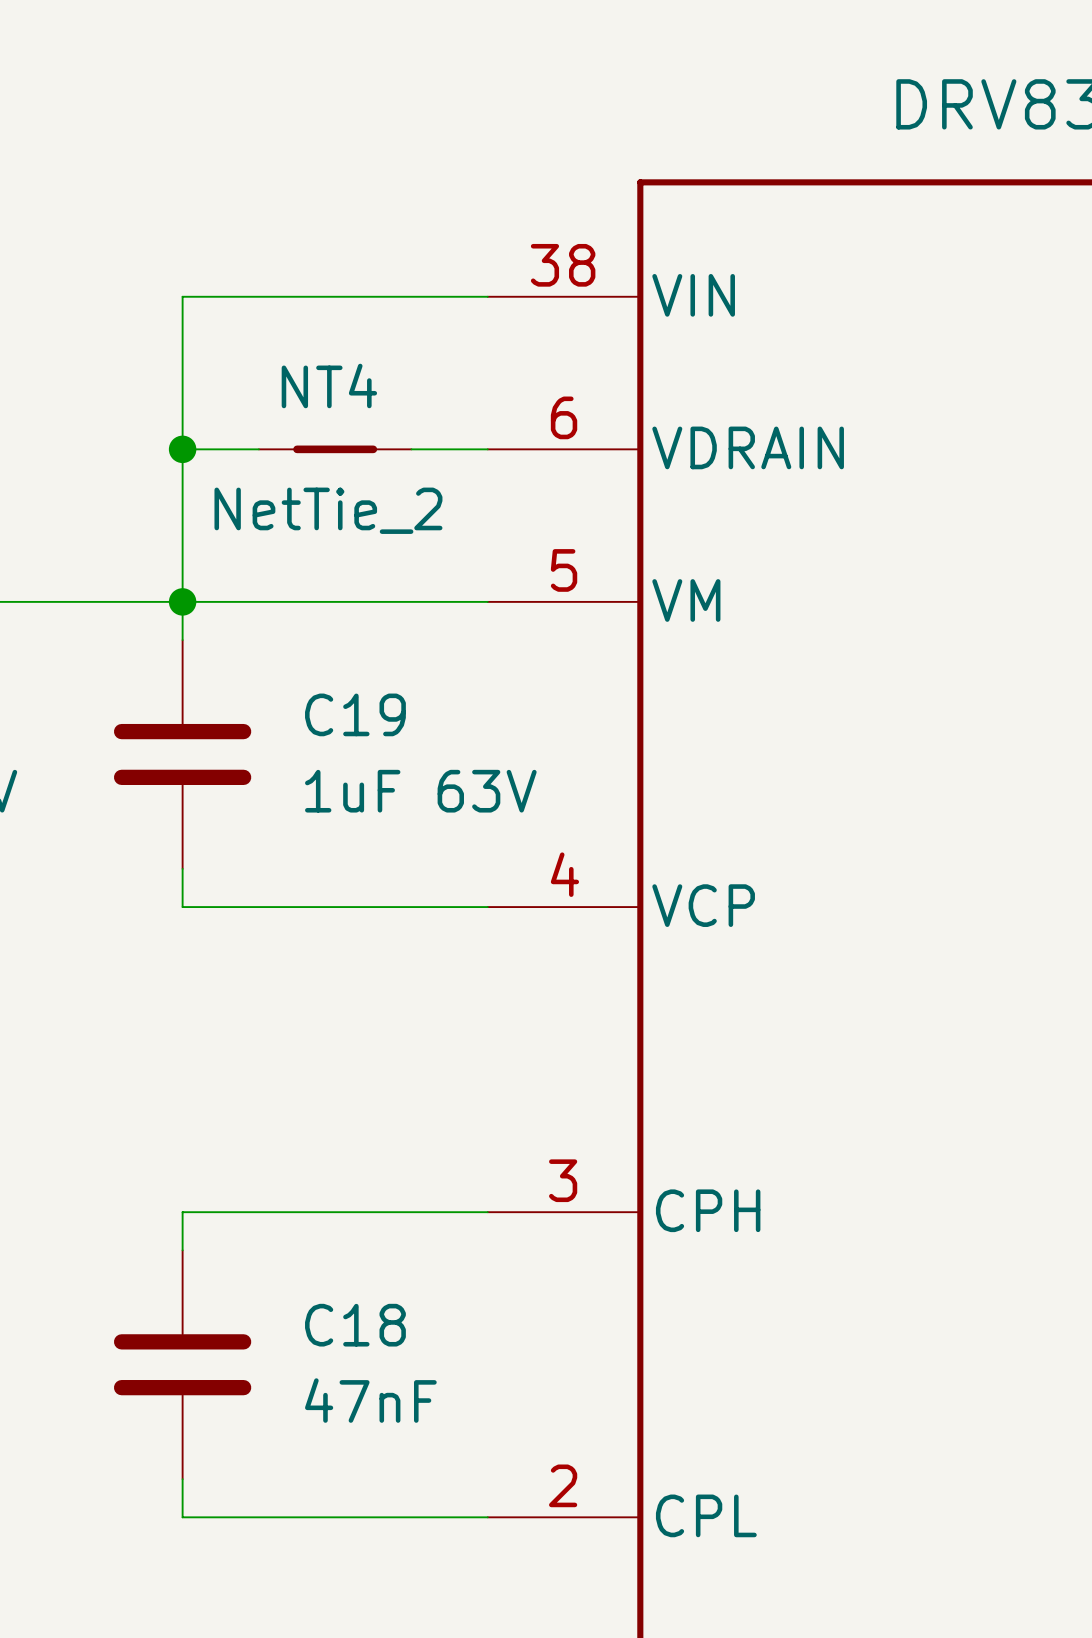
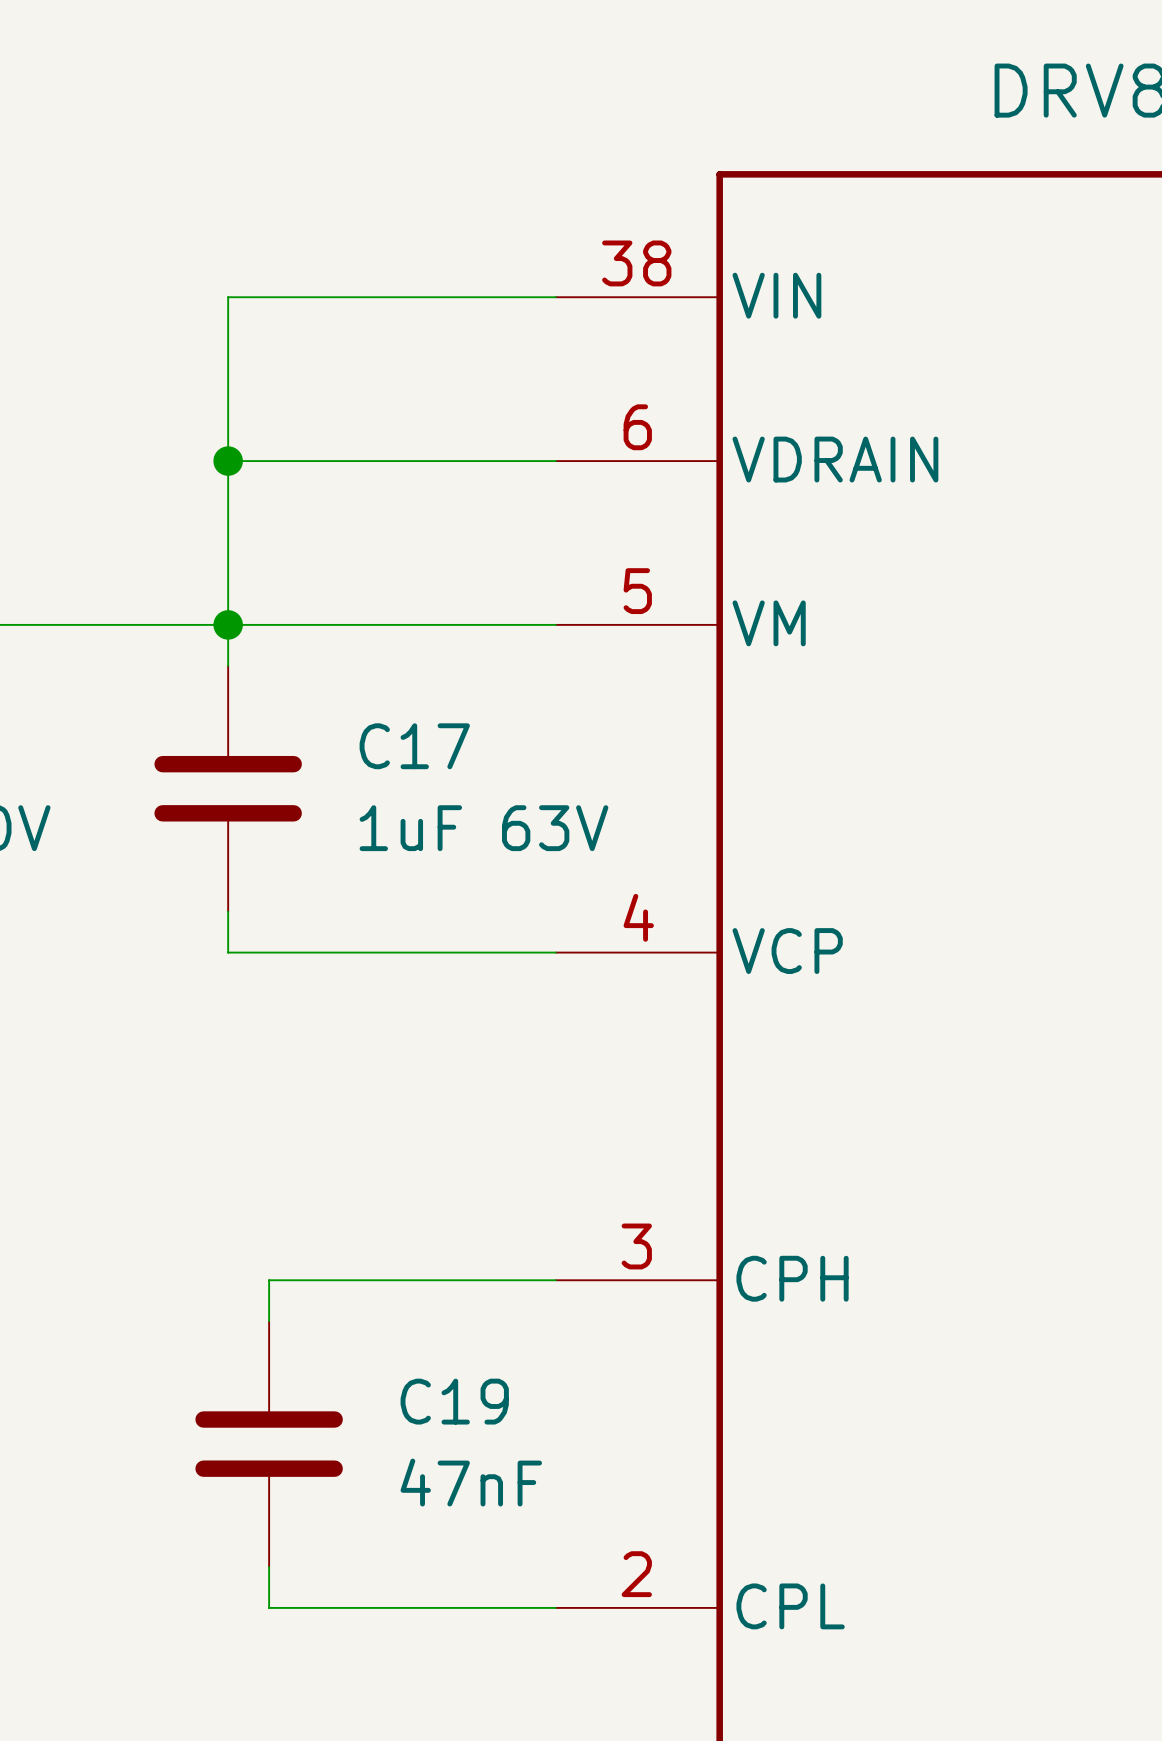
NT4: NetTie_2 (335, 449) -> none
C19 name: C19 (355, 714) -> C17 (414, 746)
wire: (220, 1212) (182, 1212) (182, 1250) -> (269, 1280) (269, 1321)
C18: 47nF (182, 1364) -> none
C19: none -> 47nF (269, 1444)
wire: (182, 1479) (182, 1517) (220, 1517) -> (269, 1566) (269, 1607)

